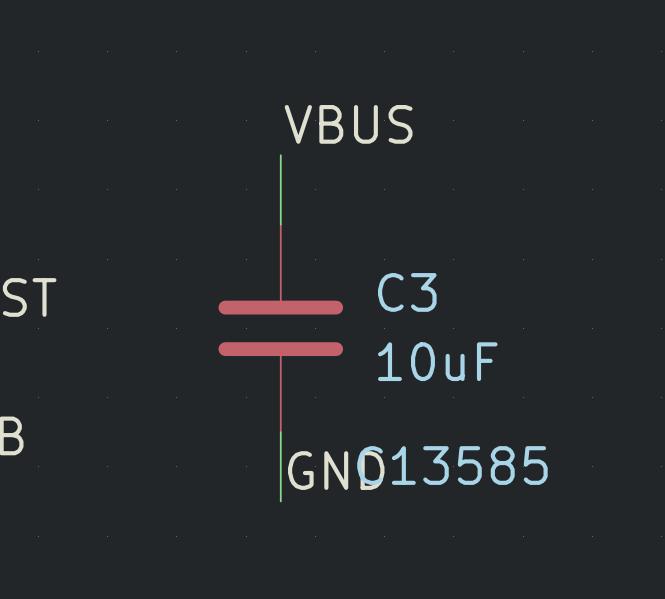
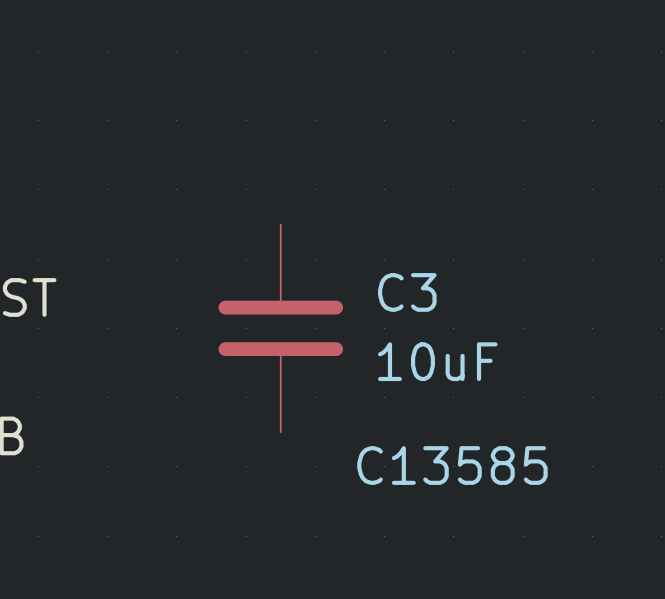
label: VBUS (348, 124) -> none
wire: (280, 155) (280, 224) -> none
wire: (280, 432) (280, 501) -> none
label: GND (336, 470) -> none

